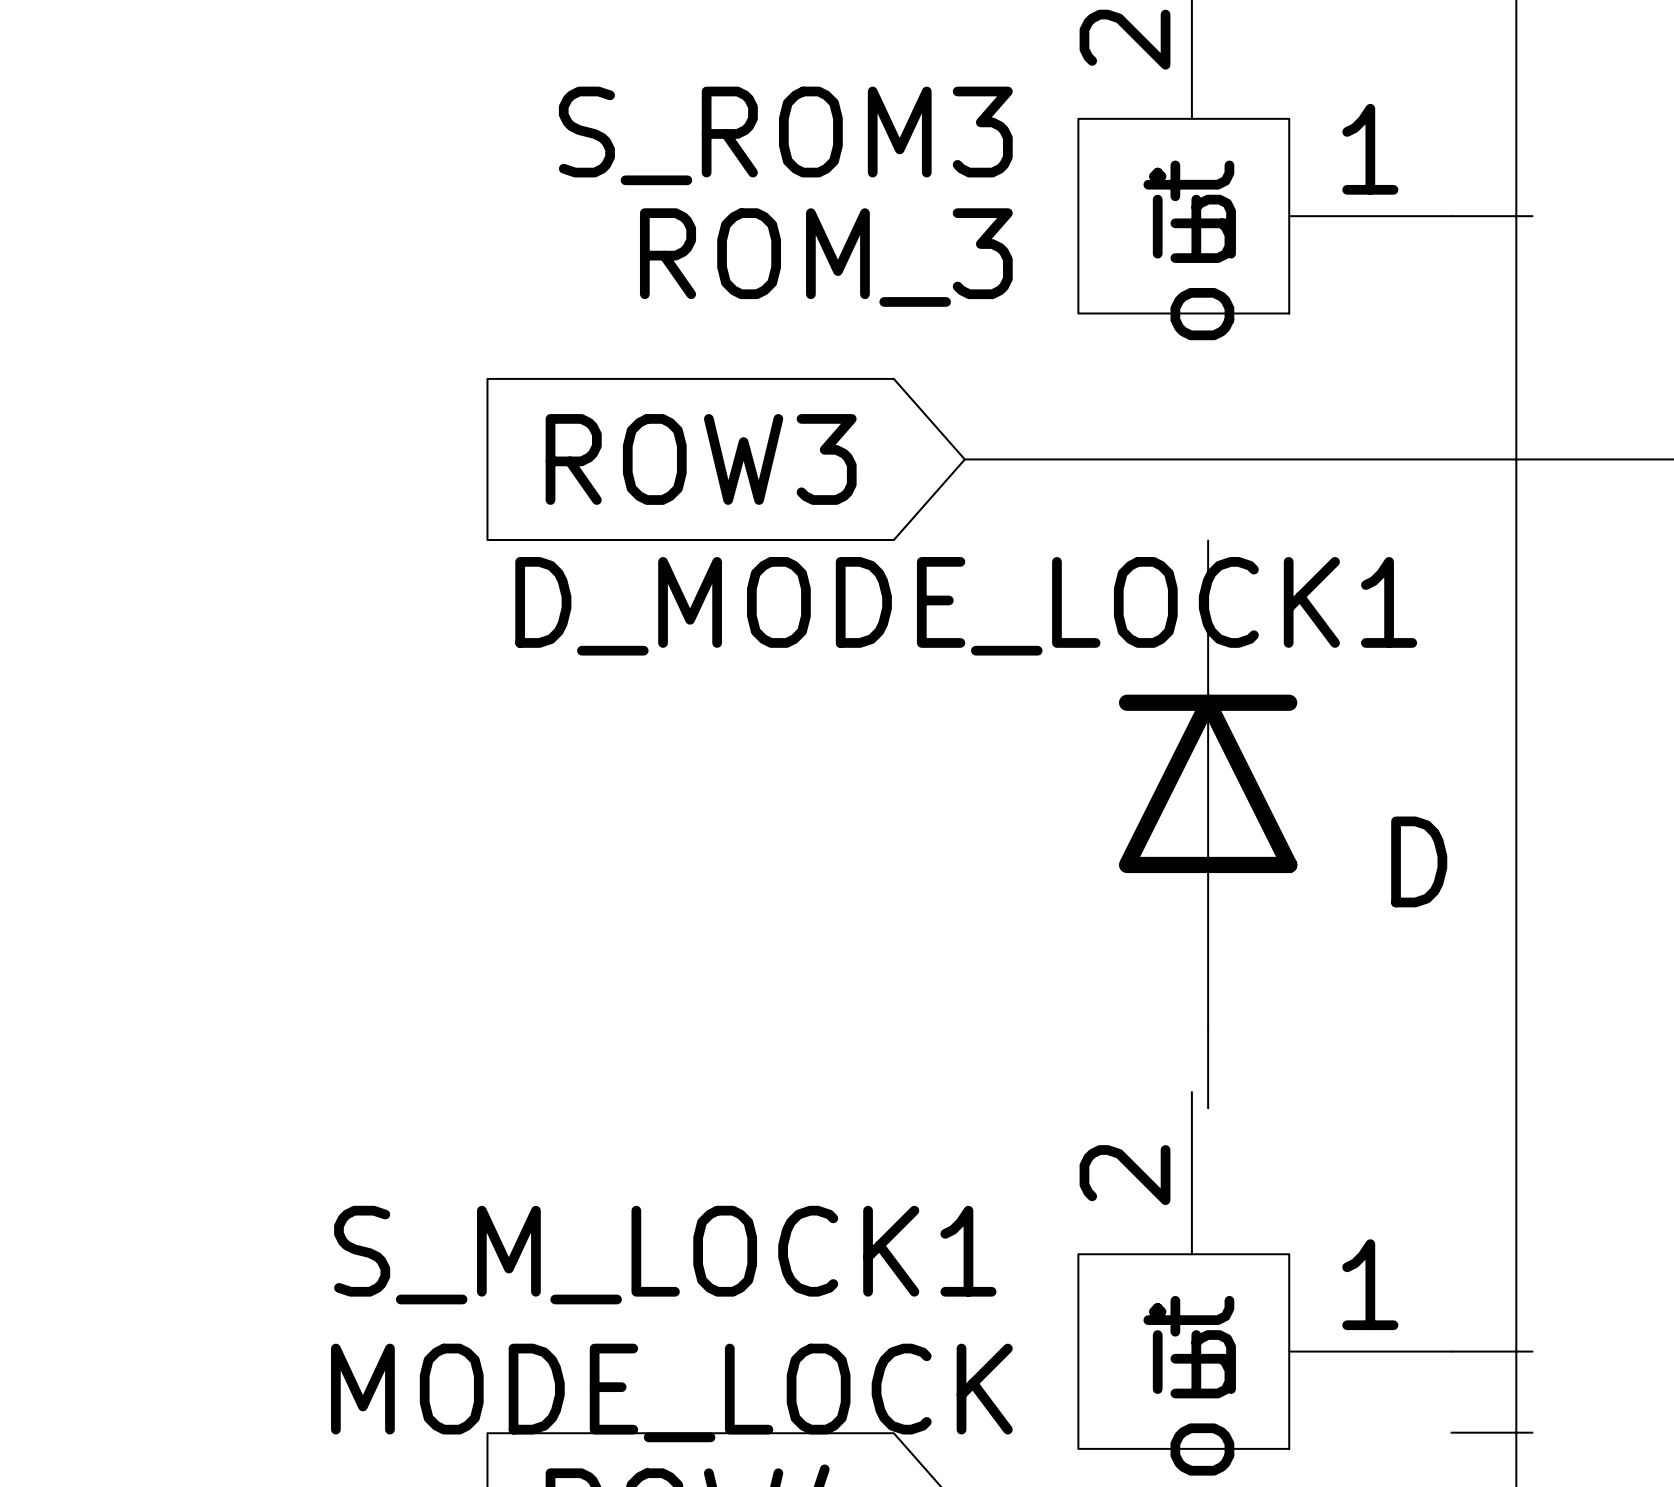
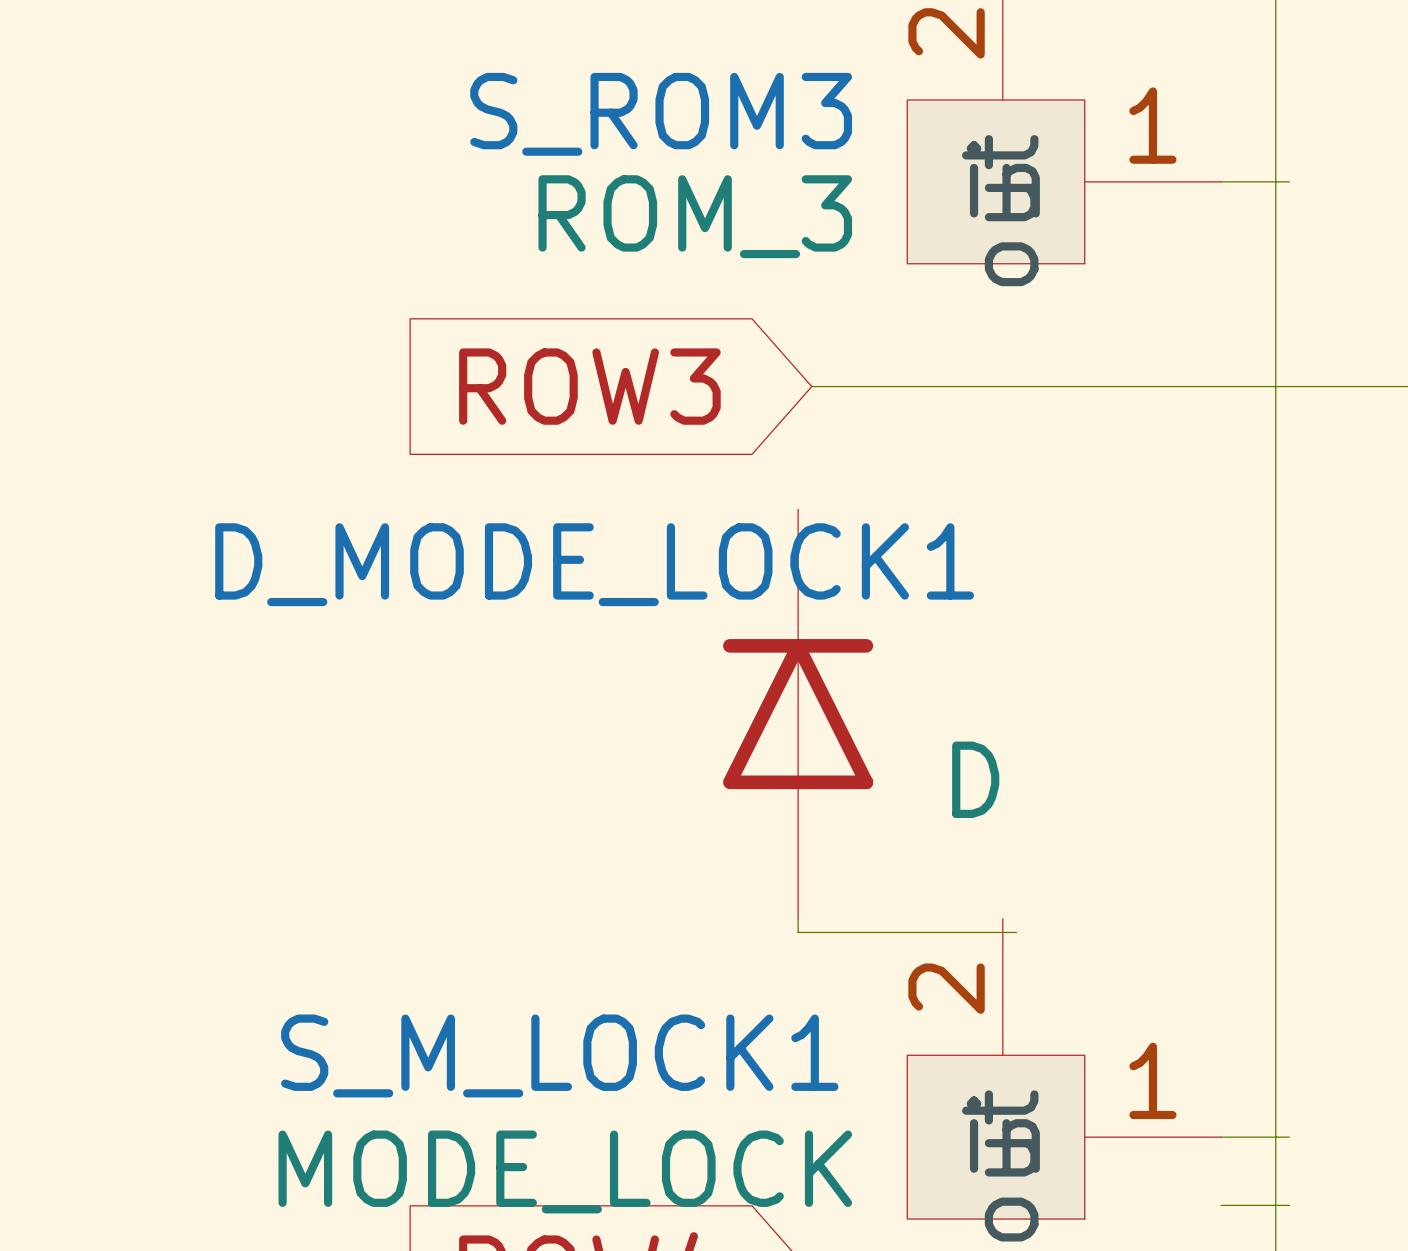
D_MODE_LOCK1 position: (1208, 783) -> (798, 714)
wire: (1208, 1027) (1208, 1108) -> (798, 918) (798, 932) (1016, 932)

